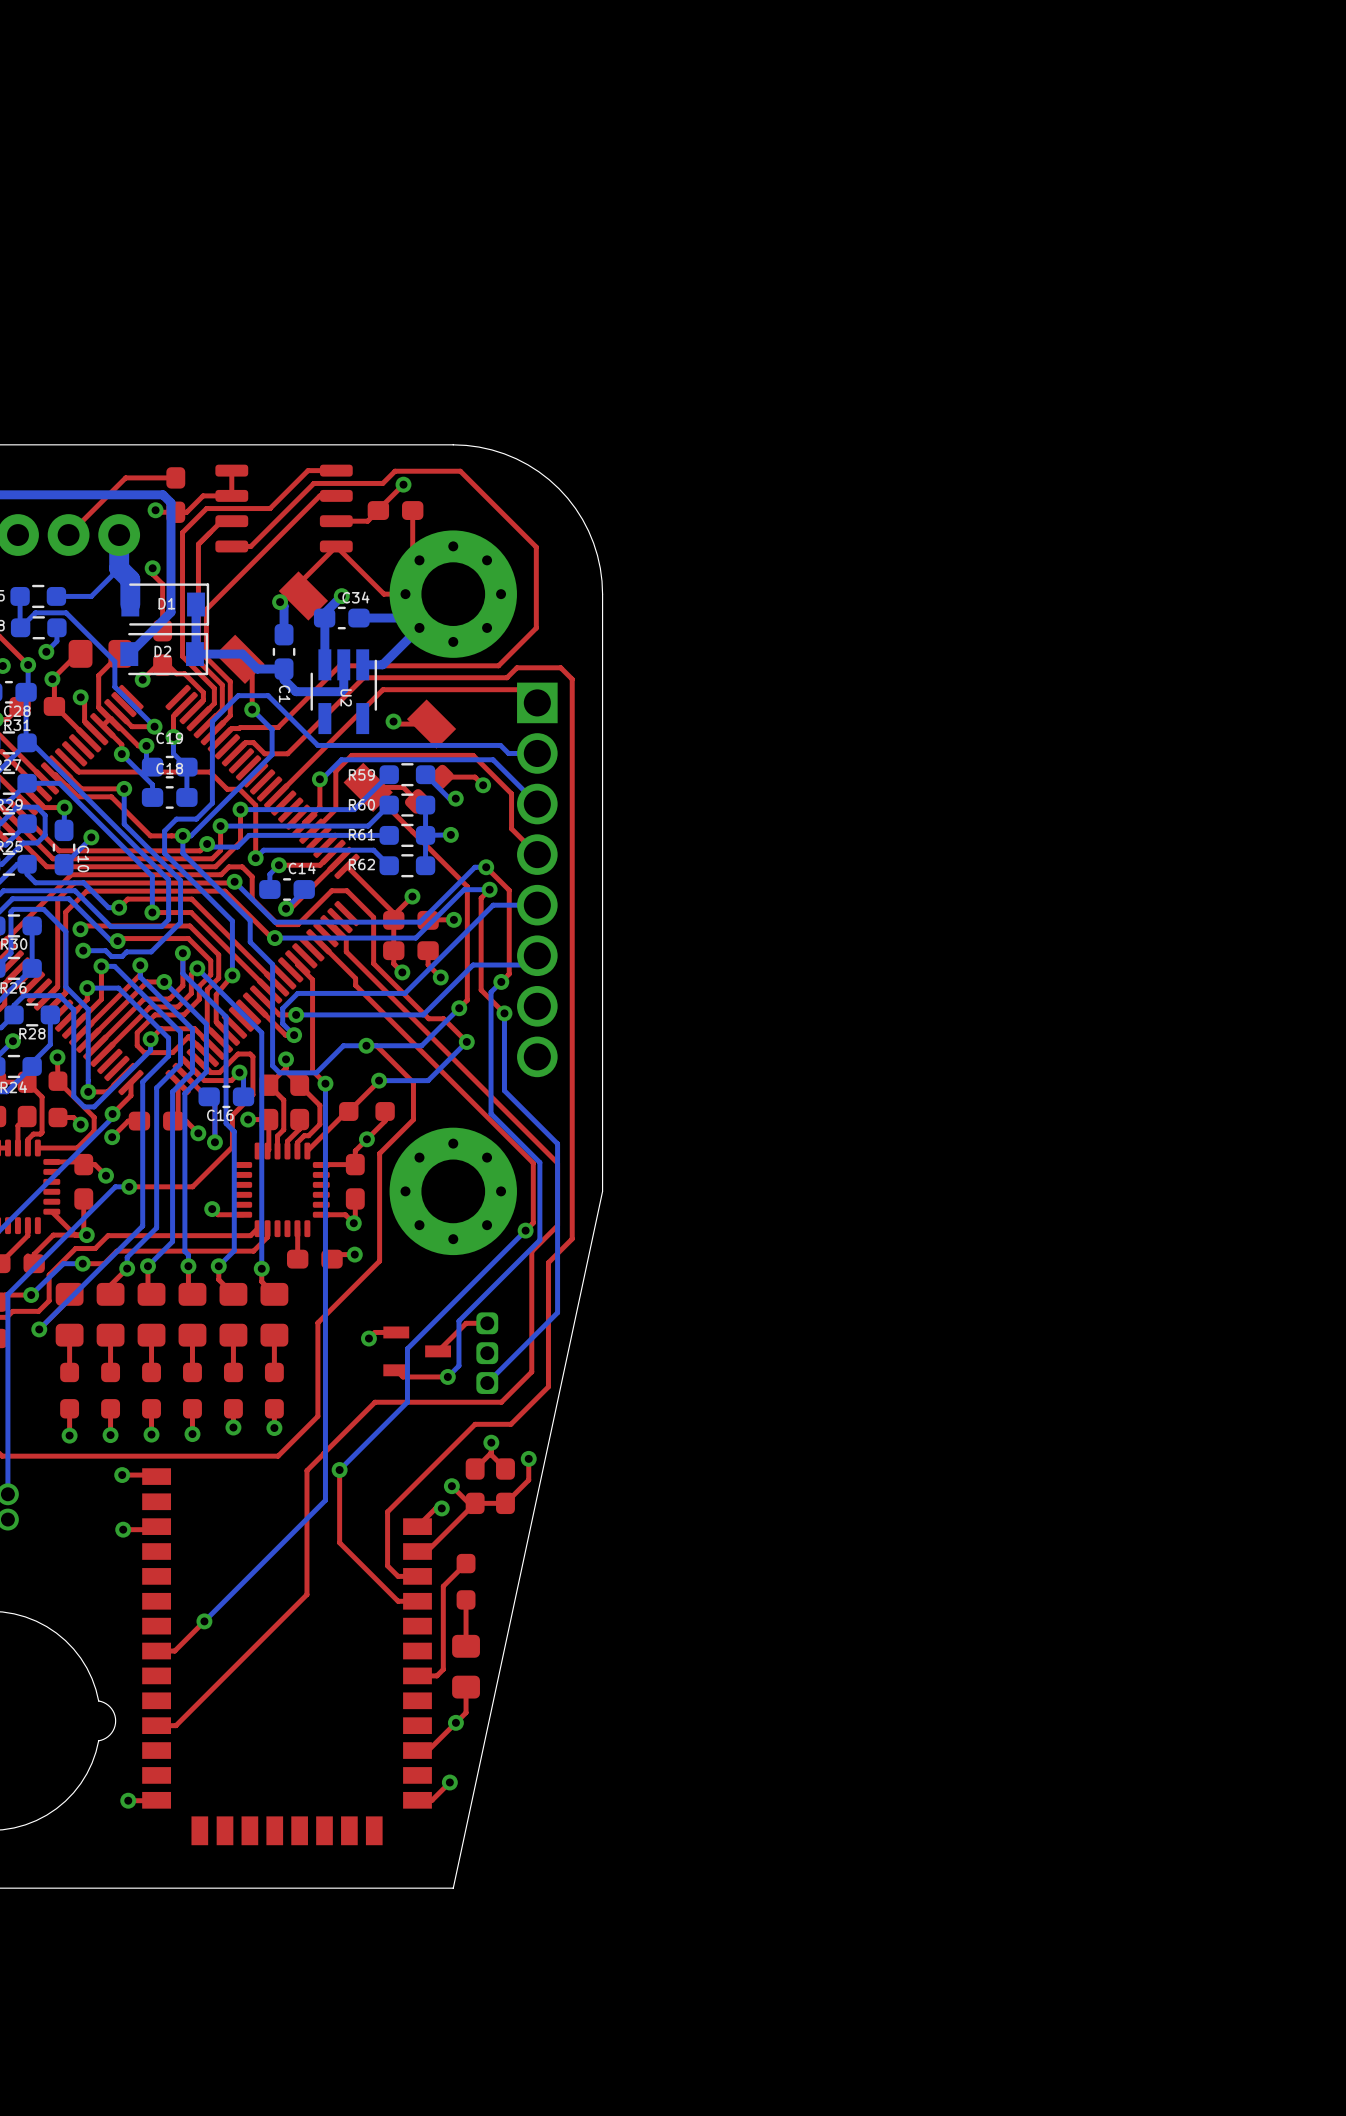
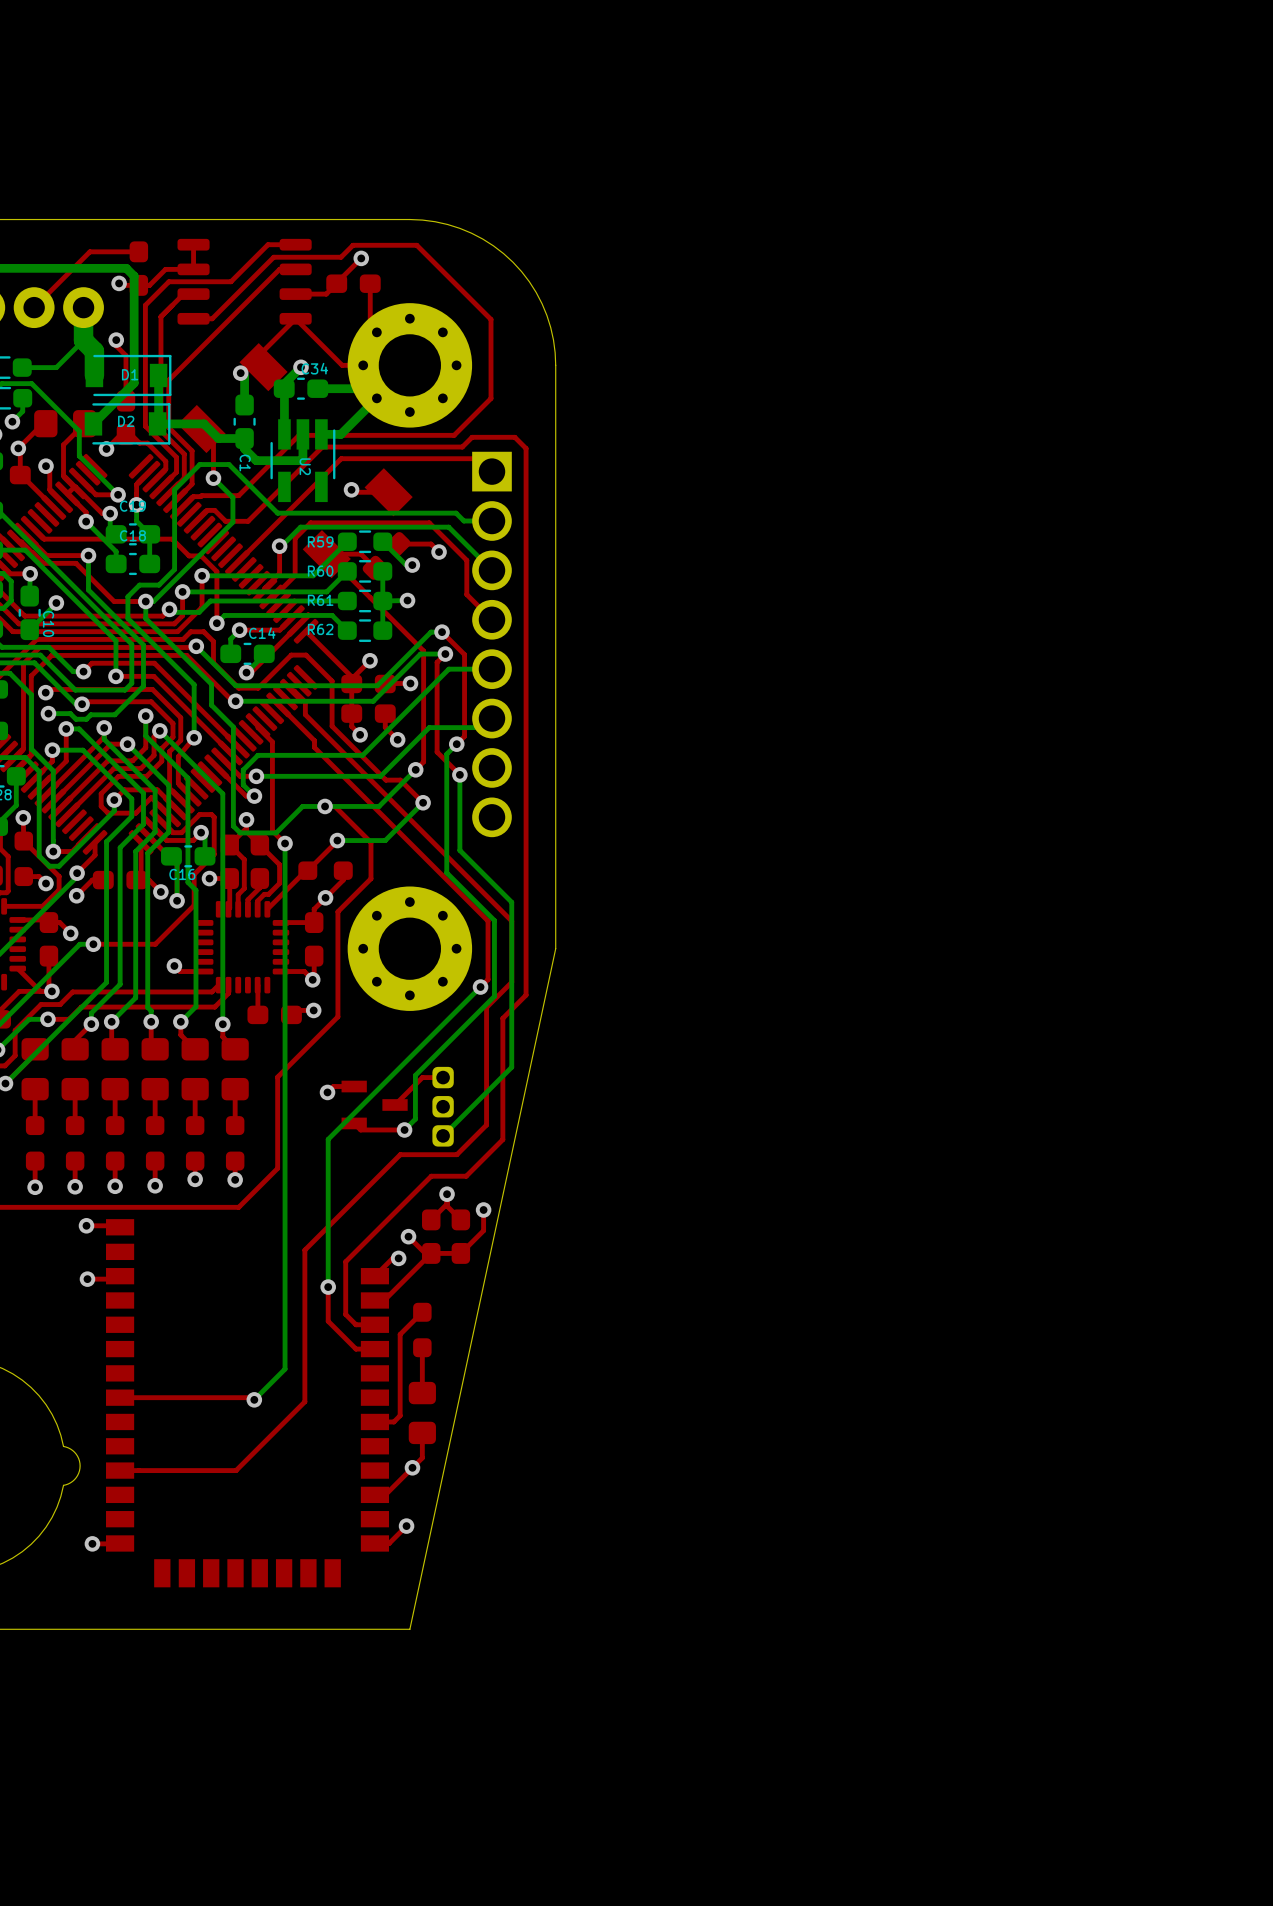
bottom track: (407, 1348) (407, 1402) (339, 1470) -> (365, 1102) (328, 1139) (328, 1287)
top track: (443, 1402) (375, 1402) (324, 1453) -> none
top track: (324, 1453) (306, 1470) (306, 1594) (175, 1725) -> (400, 1154) (304, 1250) (304, 1401) (236, 1470) (139, 1470)
top track: (339, 1470) (339, 1542) (369, 1572) -> (328, 1287) (328, 1321)
via position: (339, 1470) -> (328, 1287)
bottom track: (325, 1500) (204, 1621) -> (285, 1250) (285, 1369) (254, 1399)
top track: (204, 1621) (174, 1651) -> (254, 1399) (252, 1397) (137, 1397)
via: (204, 1621) -> none
via: none -> (254, 1399)

